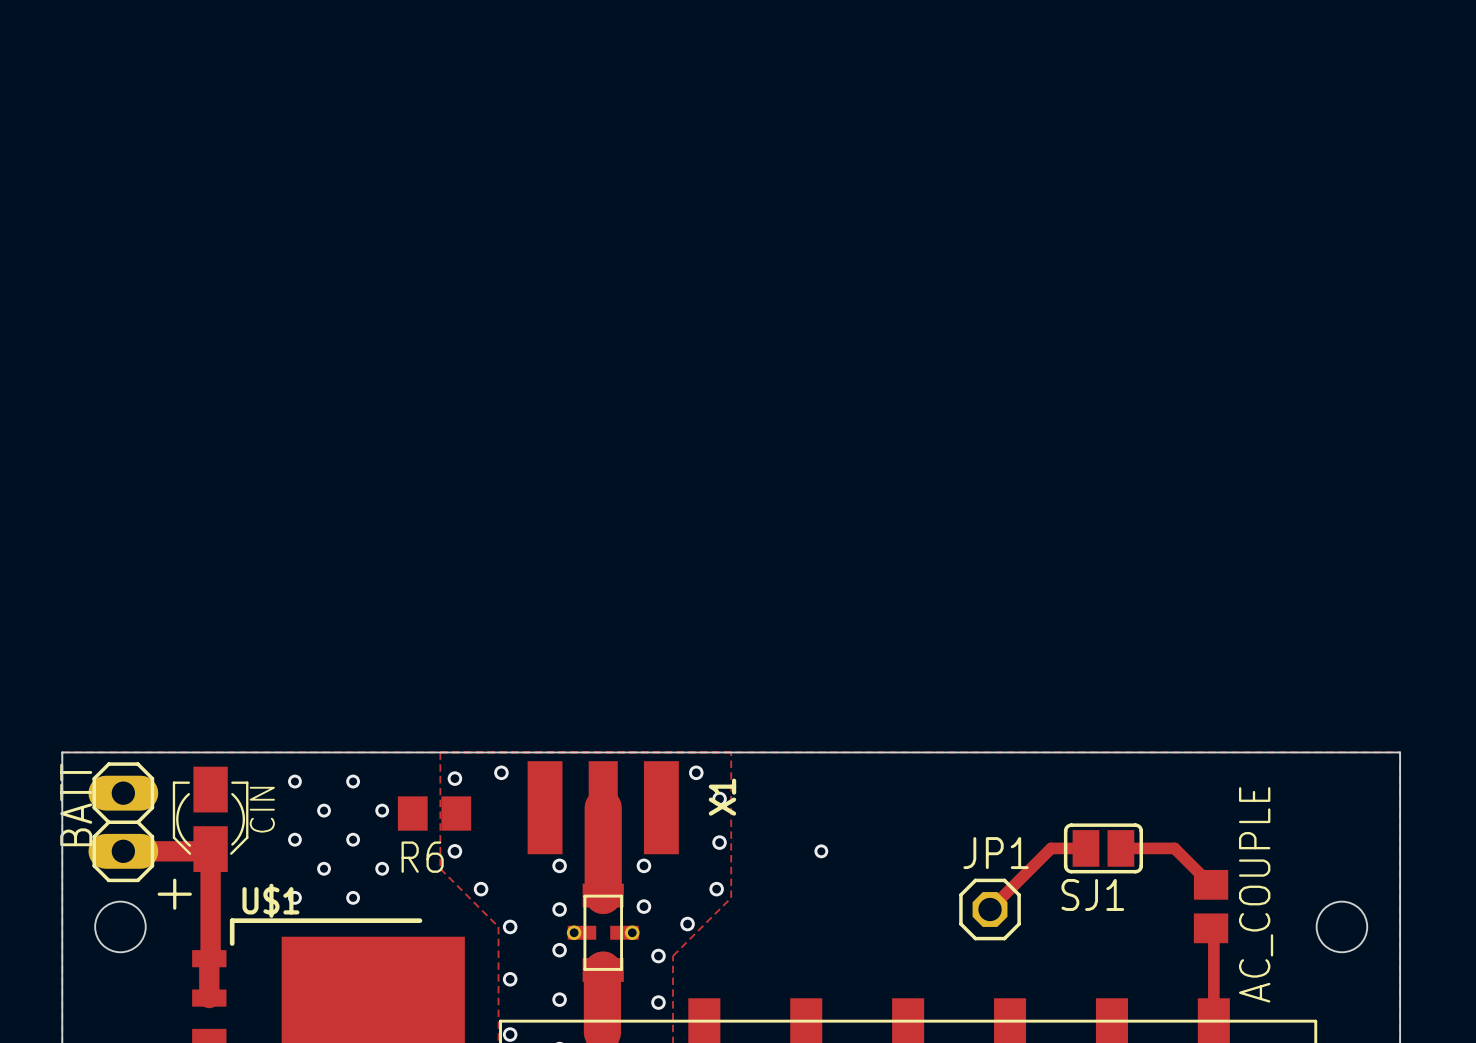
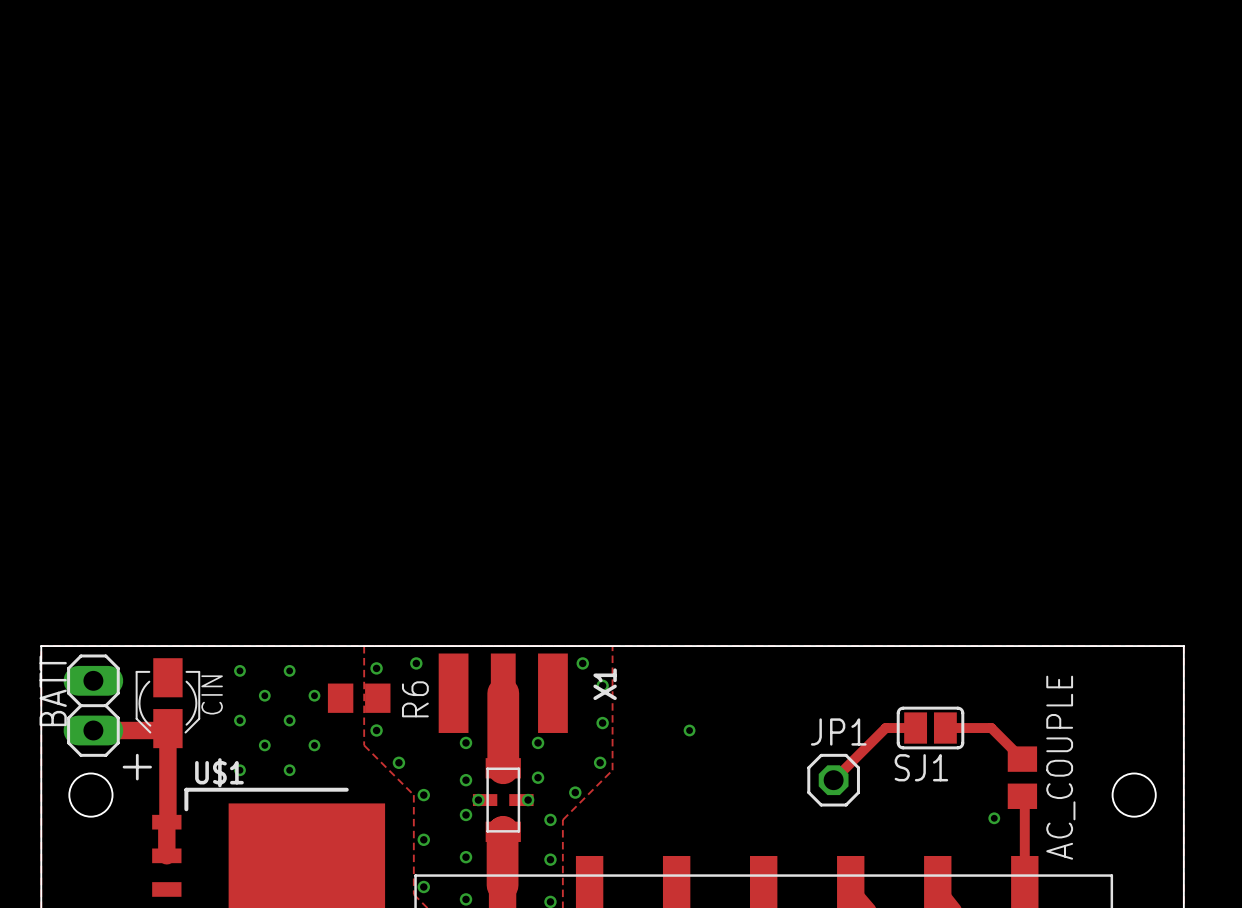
R6 name rotation: 0° (422, 857) -> 90° counterclockwise (415, 699)
R6 name position: R6 (422, 857) -> R6 (415, 699)
via: none -> (994, 818)

